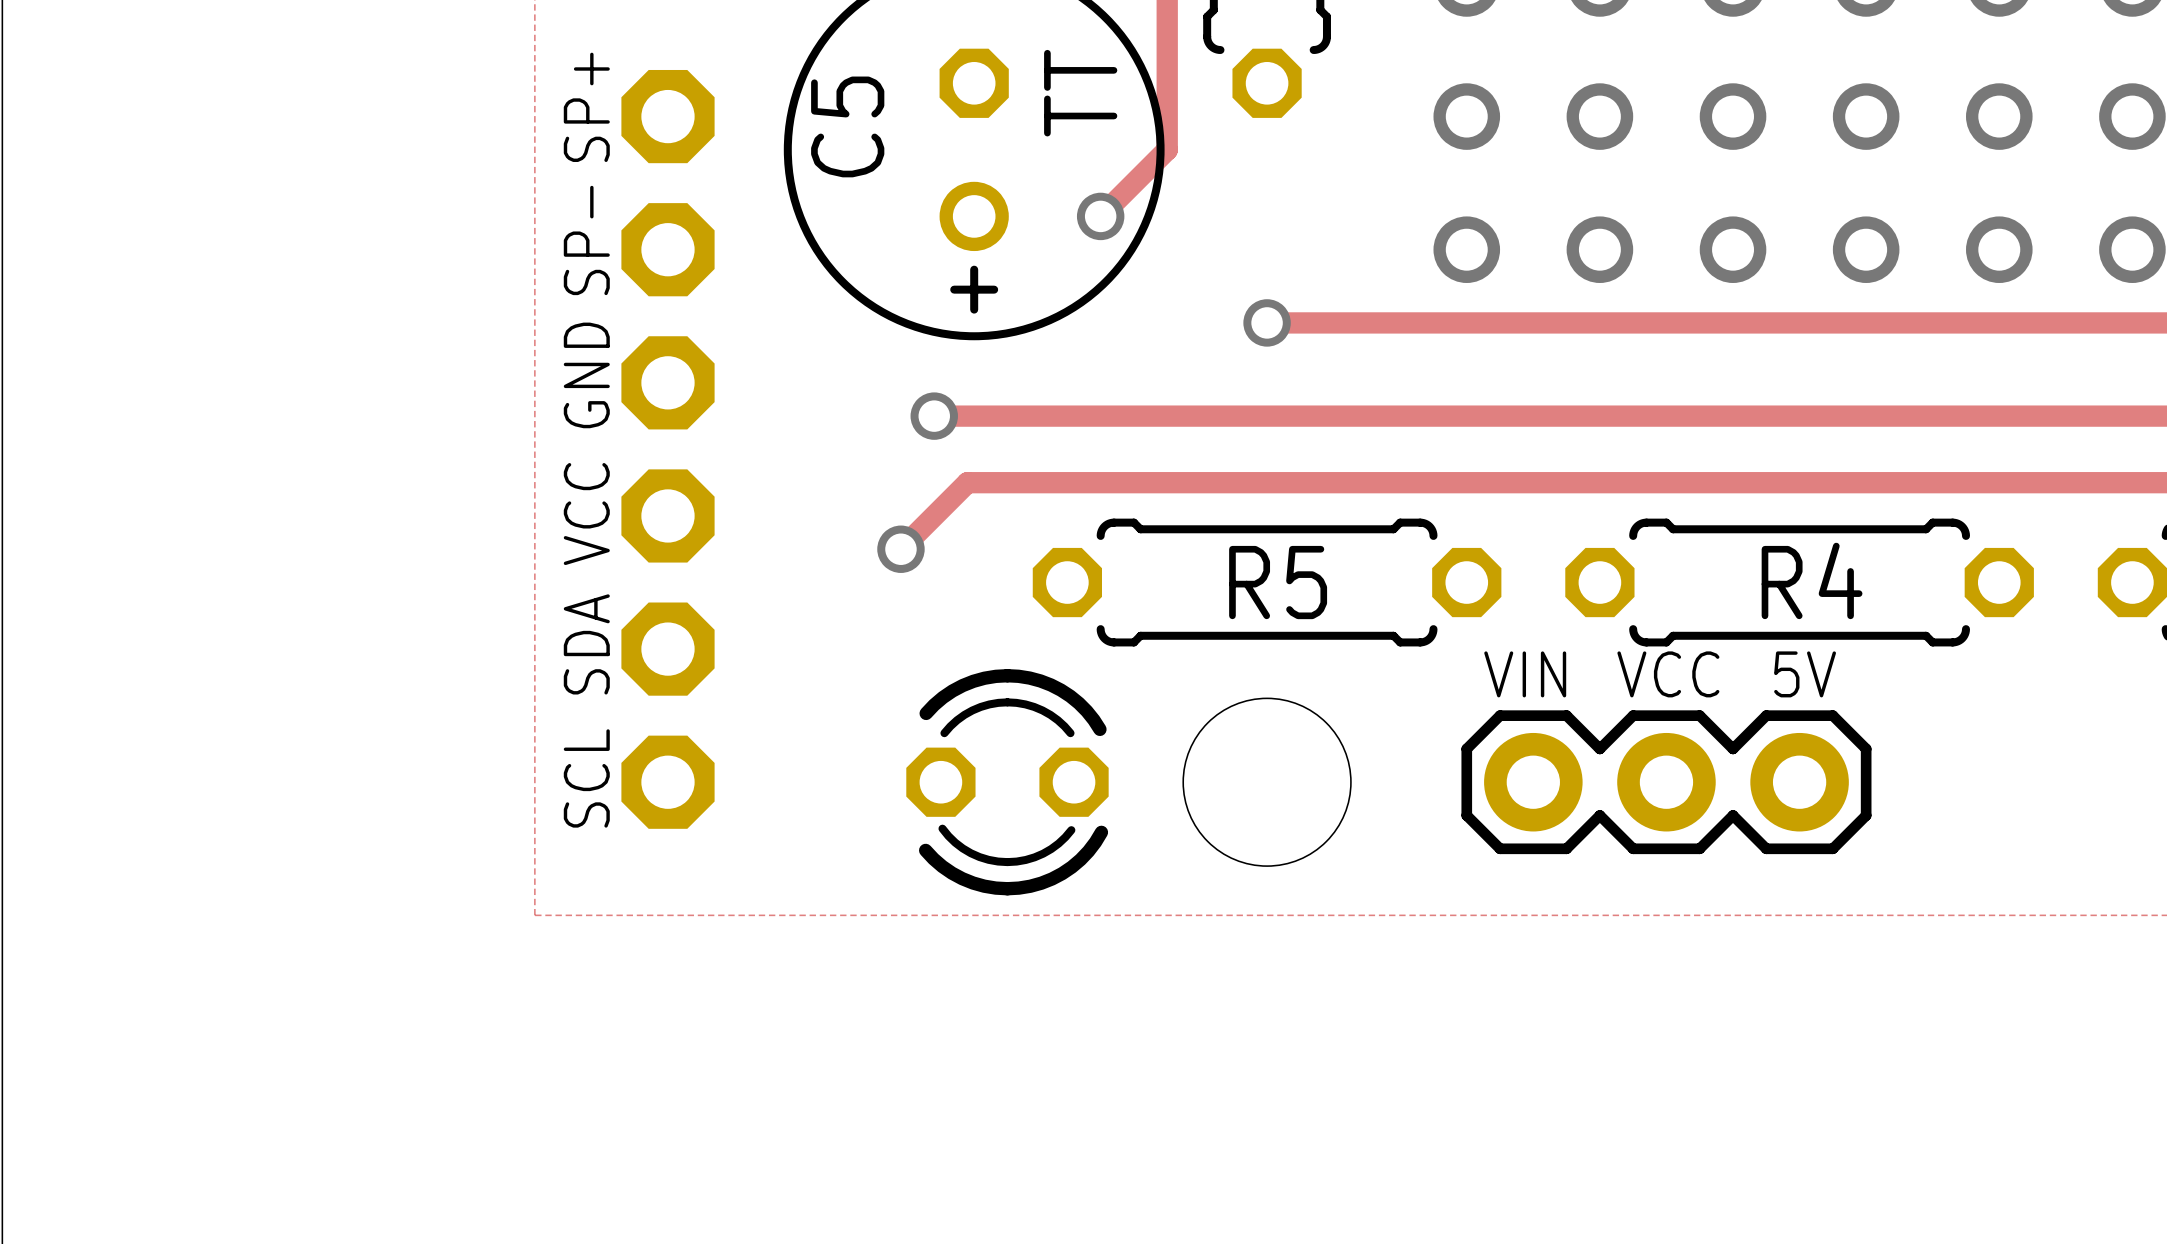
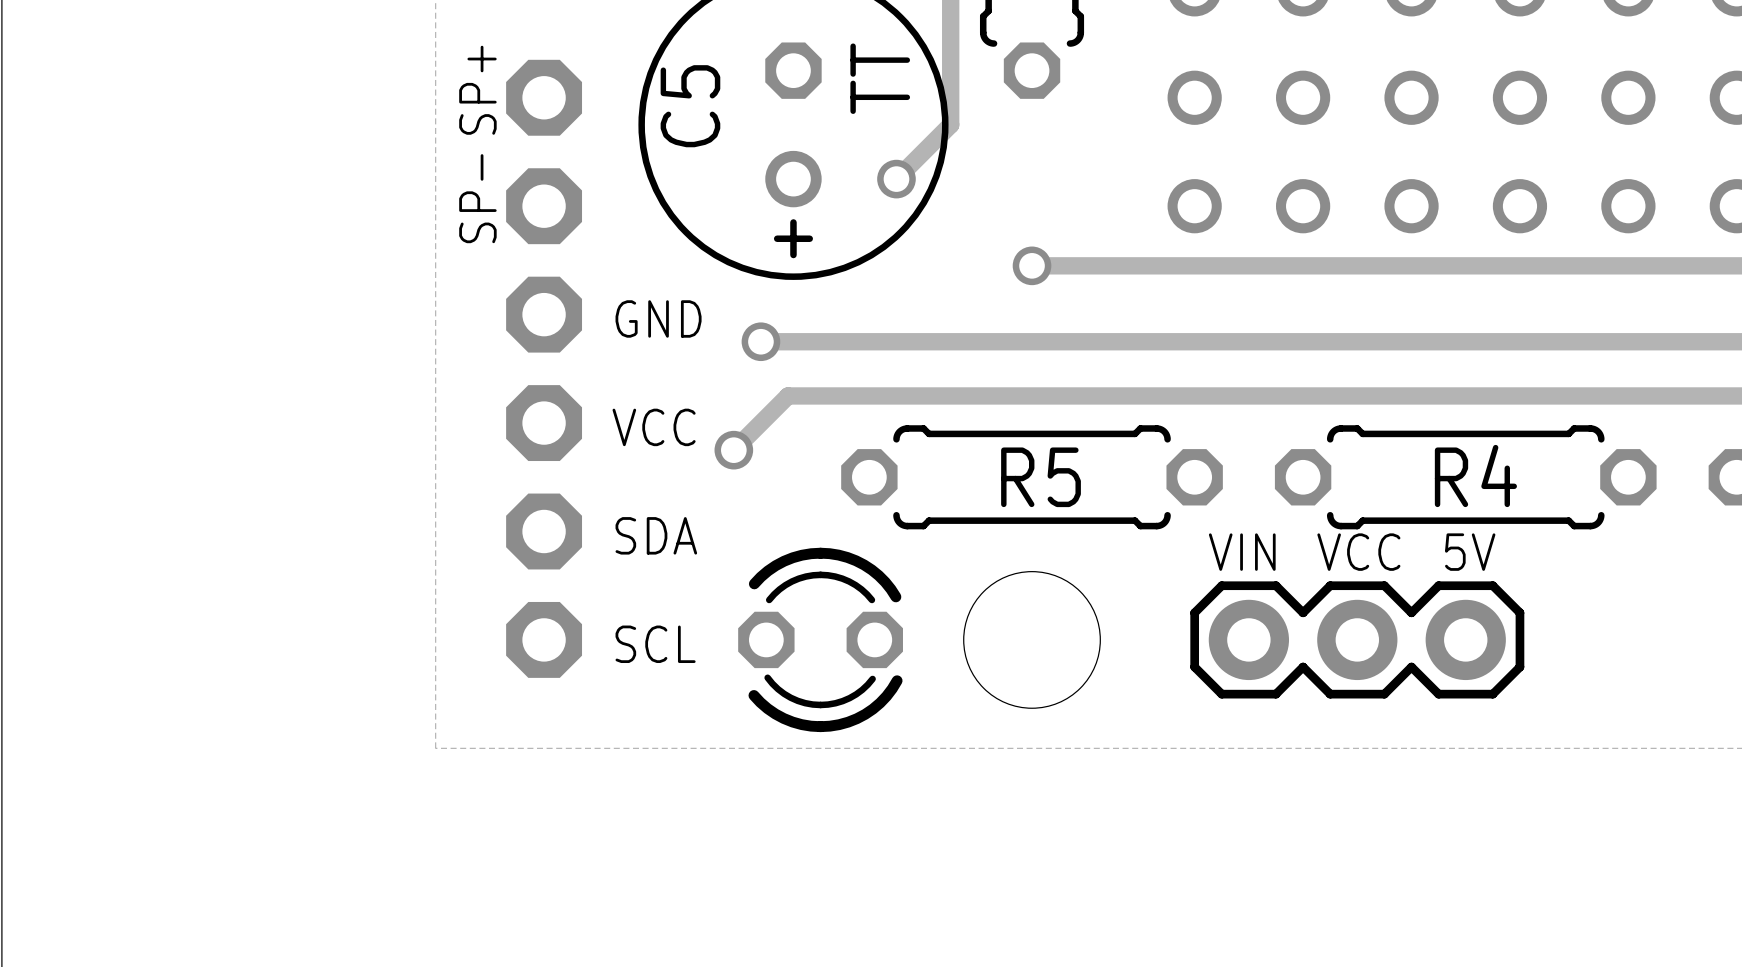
text rotation: 0° (586, 375) -> 90° clockwise (658, 318)
text position: GND (586, 375) -> GND (658, 318)
text rotation: 0° (586, 514) -> 90° clockwise (654, 427)
text position: VCC (586, 514) -> VCC (654, 427)
text rotation: 0° (586, 644) -> 90° clockwise (656, 535)
text position: SDA (586, 644) -> SDA (656, 535)
text rotation: 0° (586, 778) -> 90° clockwise (655, 644)
text position: SCL (586, 778) -> SCL (655, 644)

